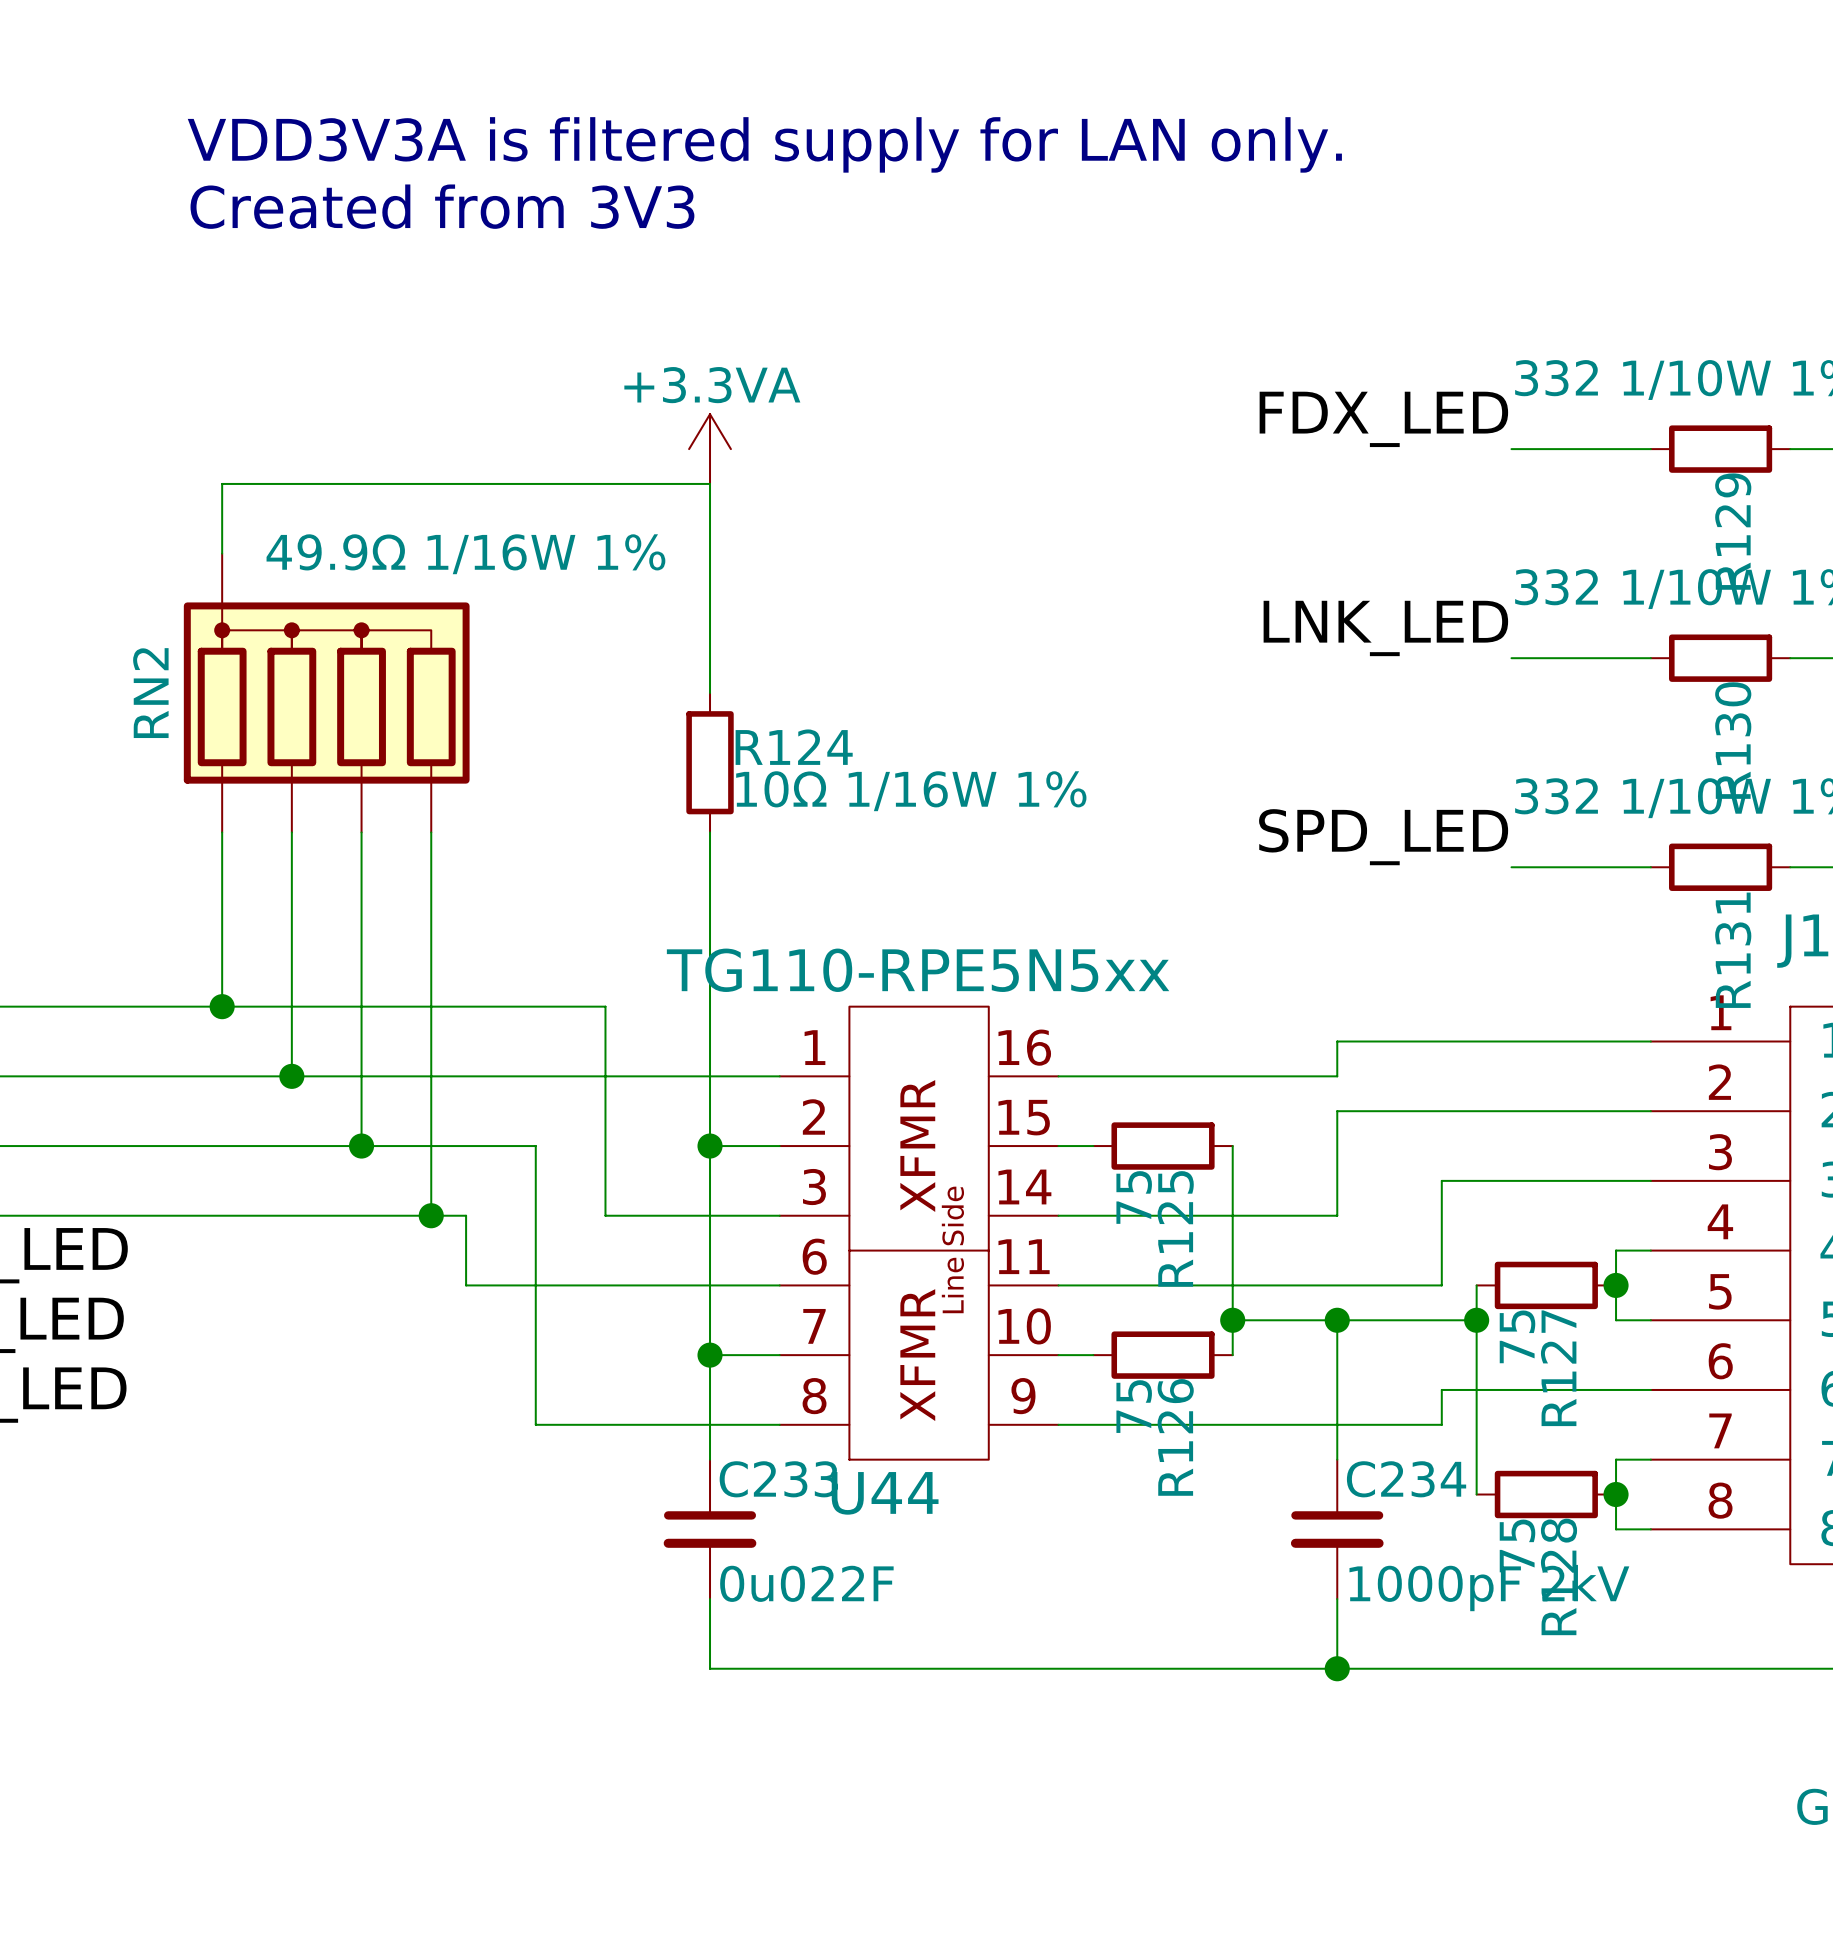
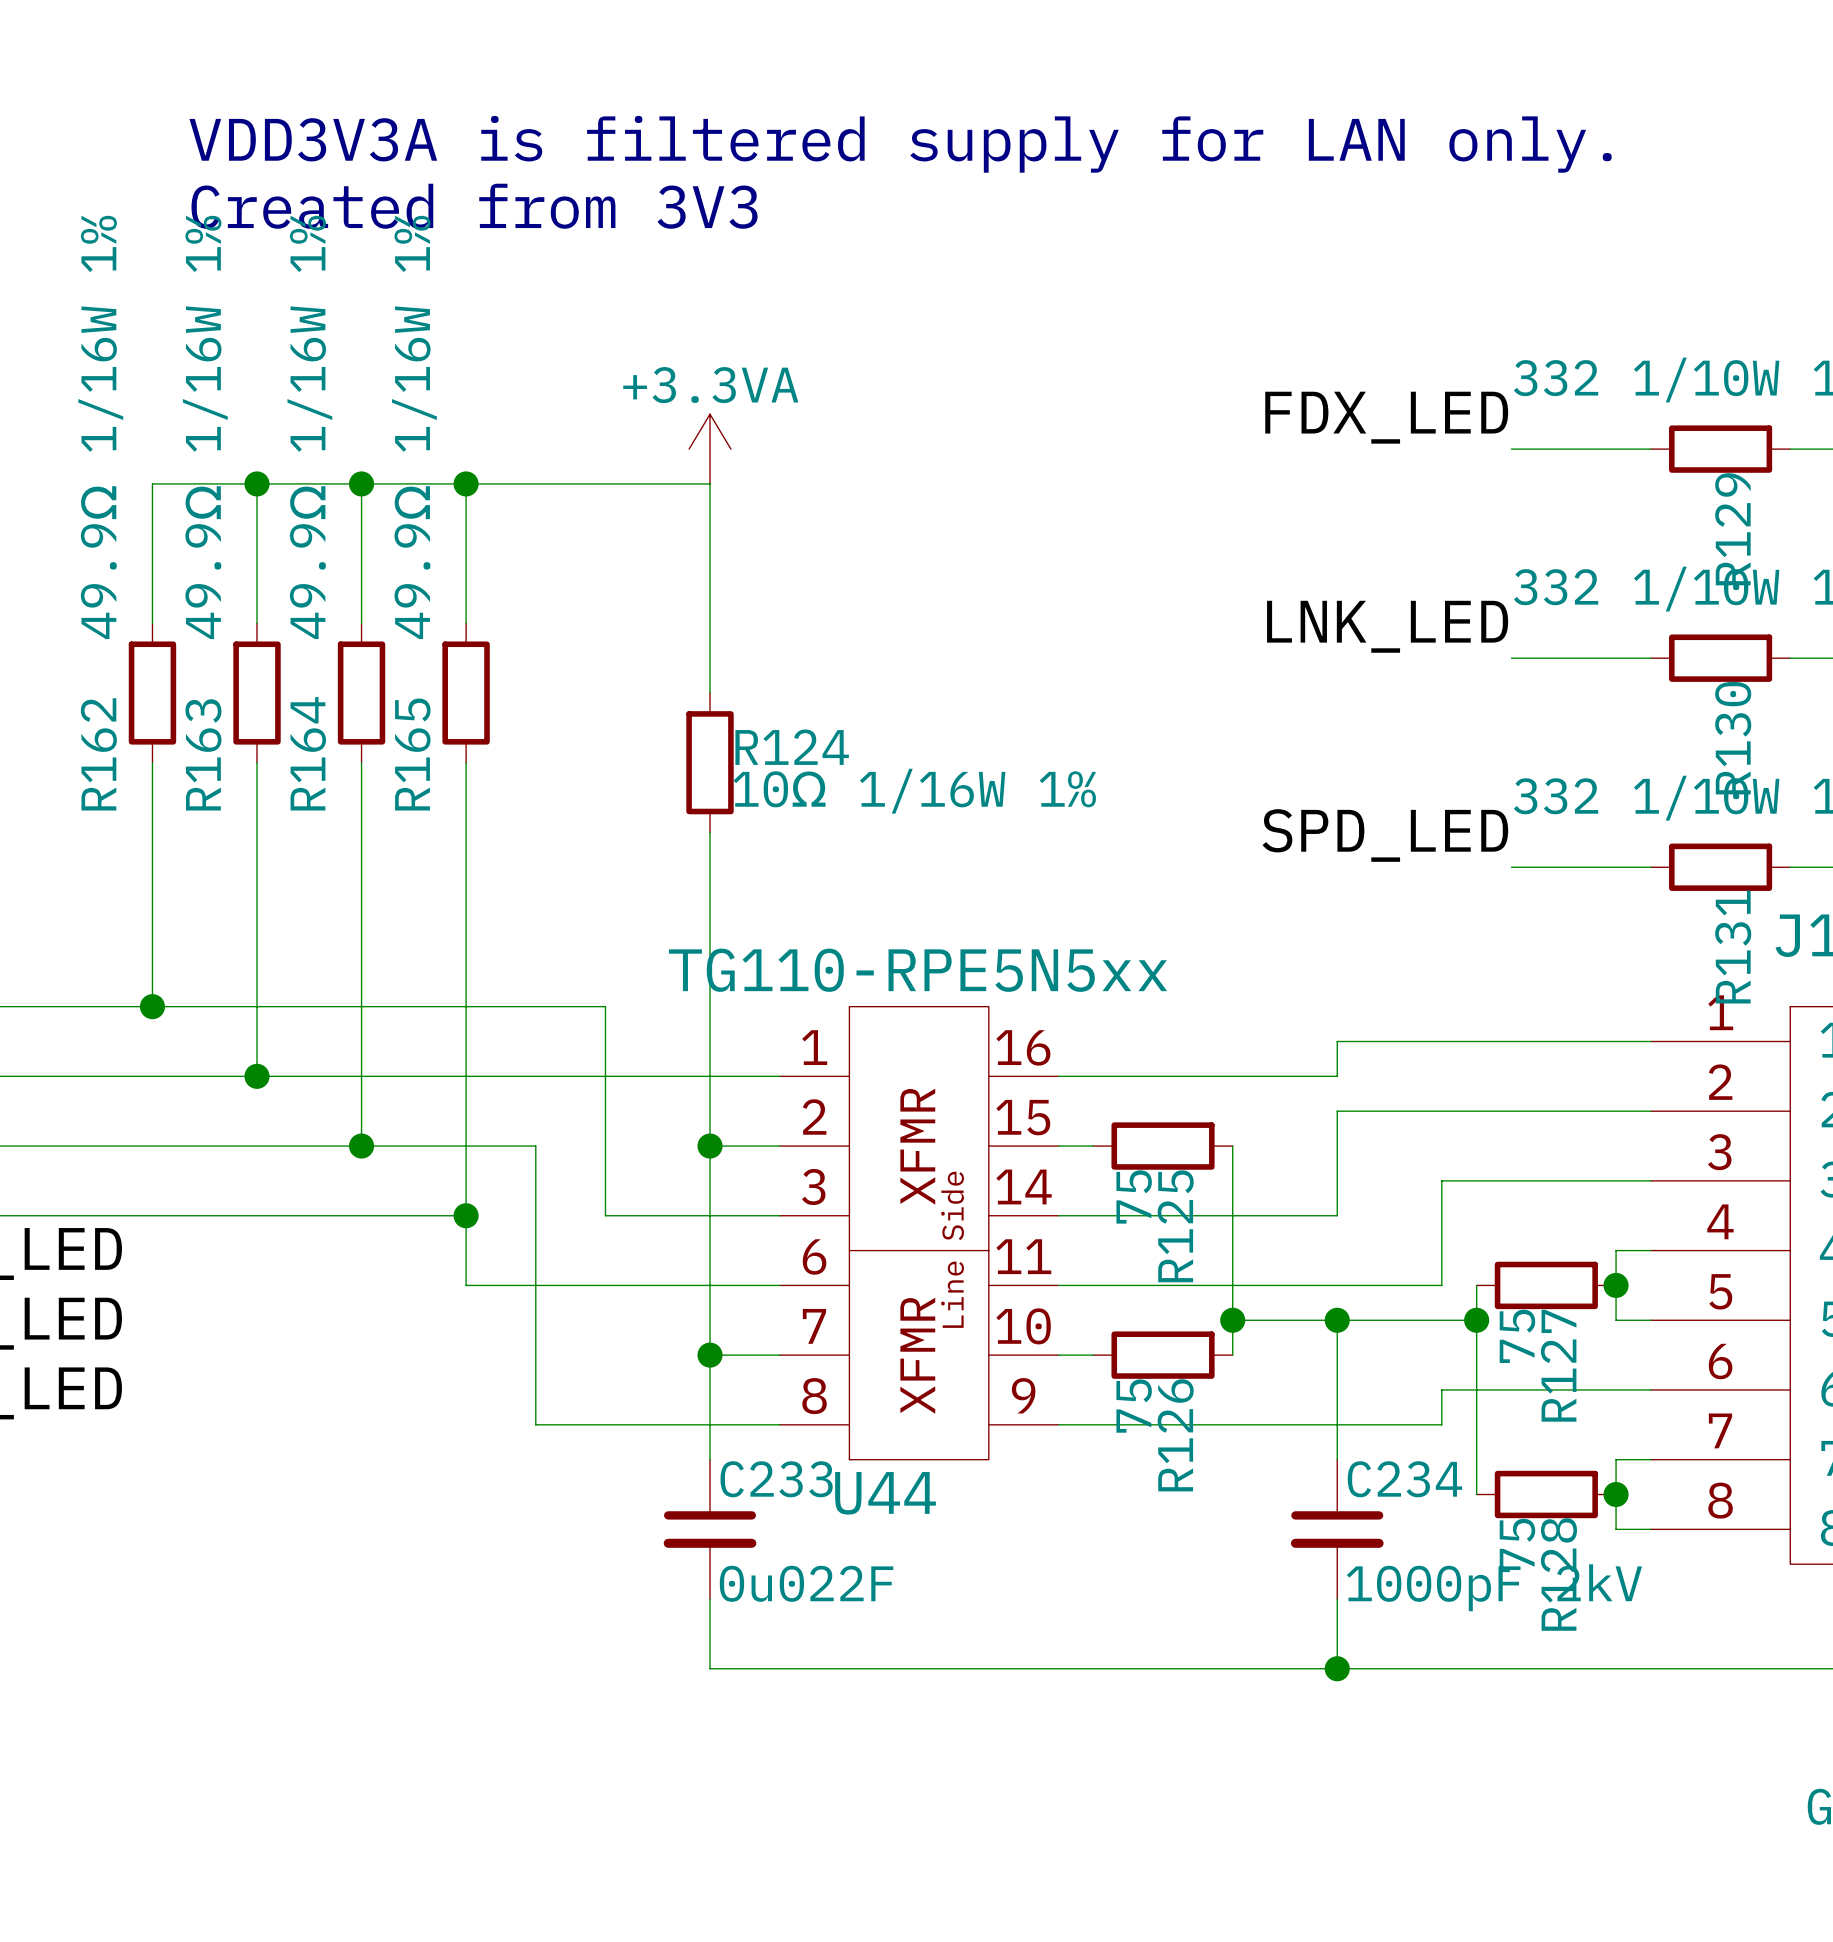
wire: (222, 483) (222, 553) -> (222, 483) (152, 483) (152, 623)
wire: none -> (257, 483) (257, 623)
junction: none -> (257, 483)
wire: none -> (361, 483) (361, 623)
junction: none -> (361, 483)
wire: none -> (466, 483) (466, 623)
junction: none -> (466, 483)
R162: none -> 49.9Ω 1/16W 1% (152, 693)
R163: none -> 49.9Ω 1/16W 1% (257, 693)
RN2: 49.9Ω 1/16W 1% (326, 693) -> none
R164: none -> 49.9Ω 1/16W 1% (361, 693)
R165: none -> 49.9Ω 1/16W 1% (466, 693)
wire: none -> (257, 762) (257, 1076)
wire: none -> (466, 762) (466, 1215)
wire: (222, 832) (222, 1006) -> none
wire: (291, 832) (291, 1076) -> (152, 762) (152, 1006)
wire: (431, 832) (431, 1215) -> none
junction: none -> (152, 1006)
junction: (222, 1006) -> none
junction position: (291, 1076) -> (257, 1076)
junction position: (431, 1215) -> (466, 1215)

